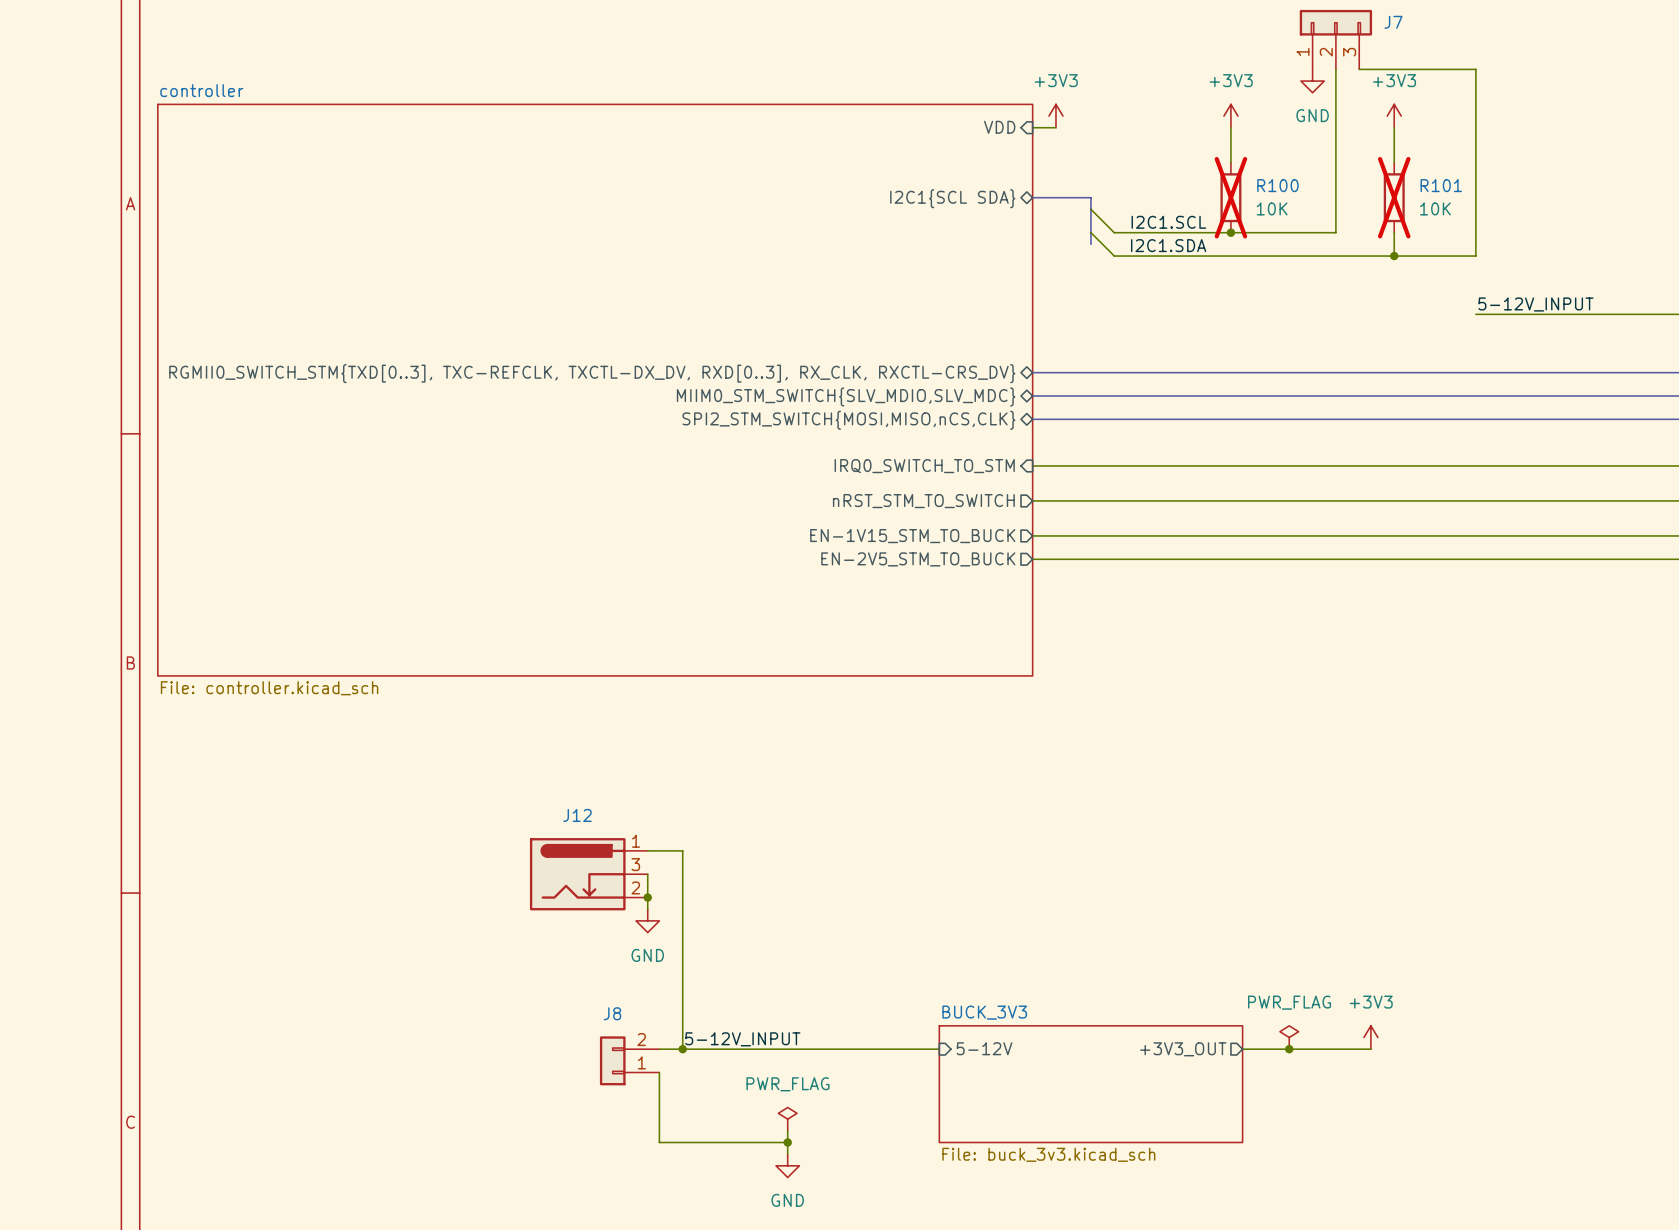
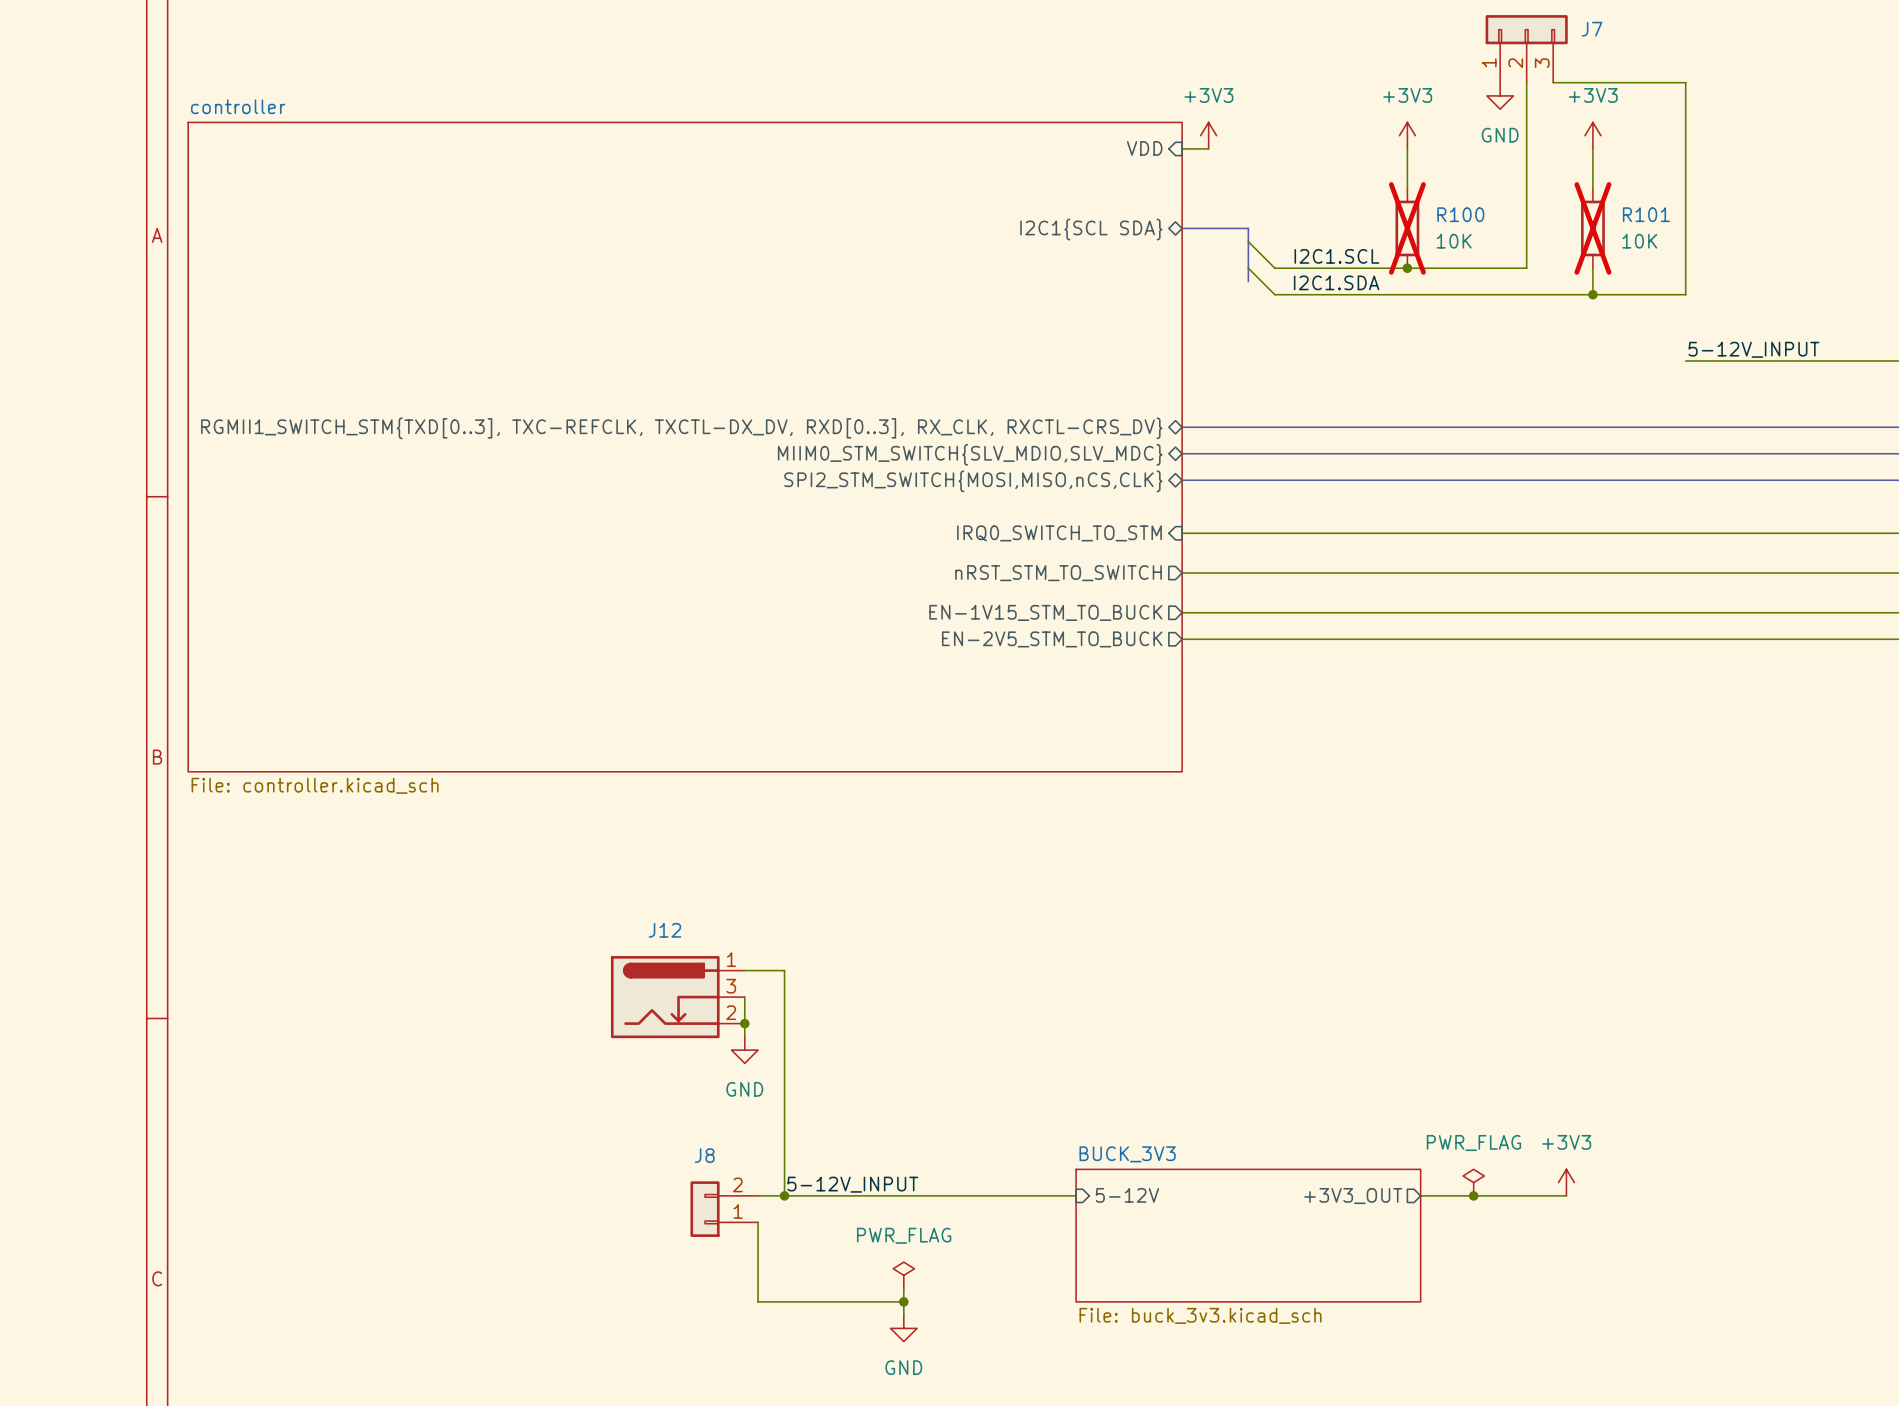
sheet pin: RGMII0_SWITCH_STM{TXD[0..3], TXC-REFCLK, TXCTL-DX_DV, RXD[0..3], RX_CLK, RXCTL-CRS_DV} (592, 373) -> RGMII1_SWITCH_STM{TXD[0..3], TXC-REFCLK, TXCTL-DX_DV, RXD[0..3], RX_CLK, RXCTL-CRS_DV} (681, 428)

